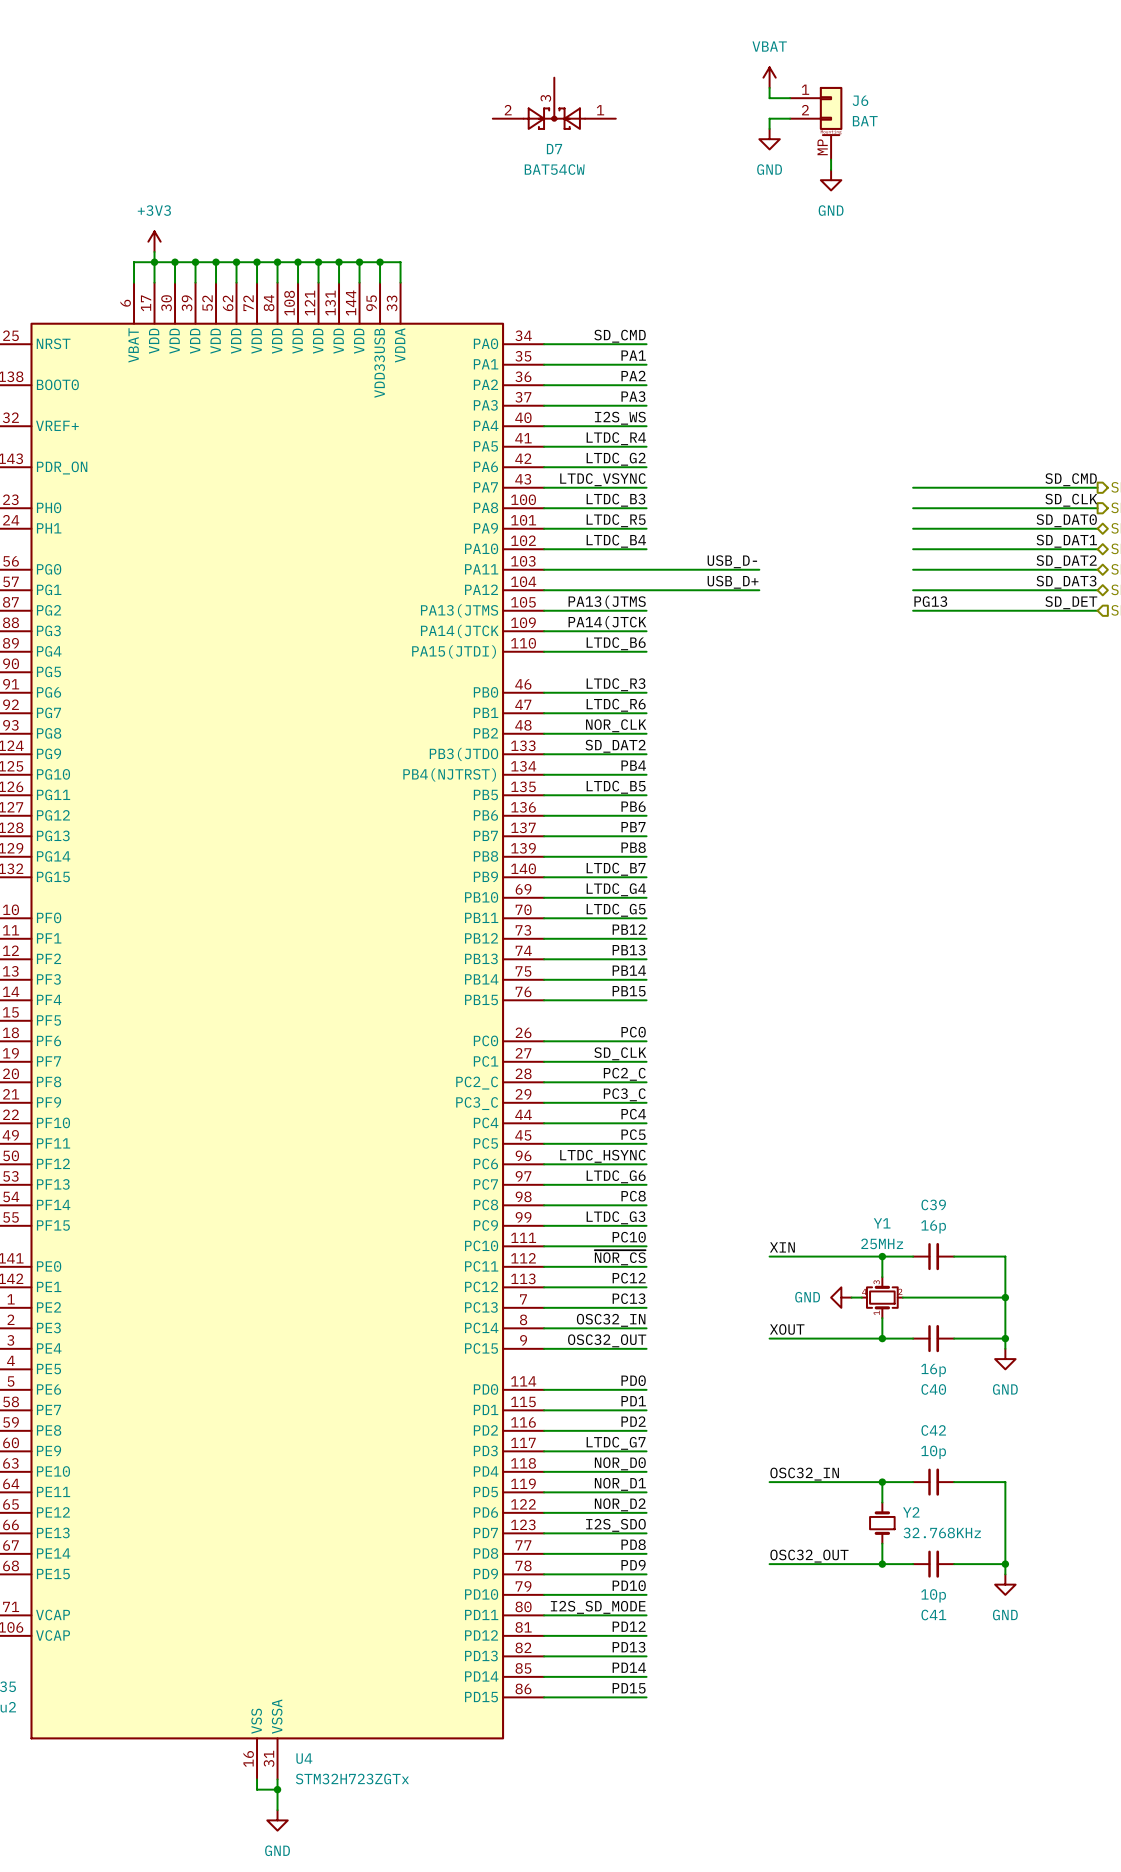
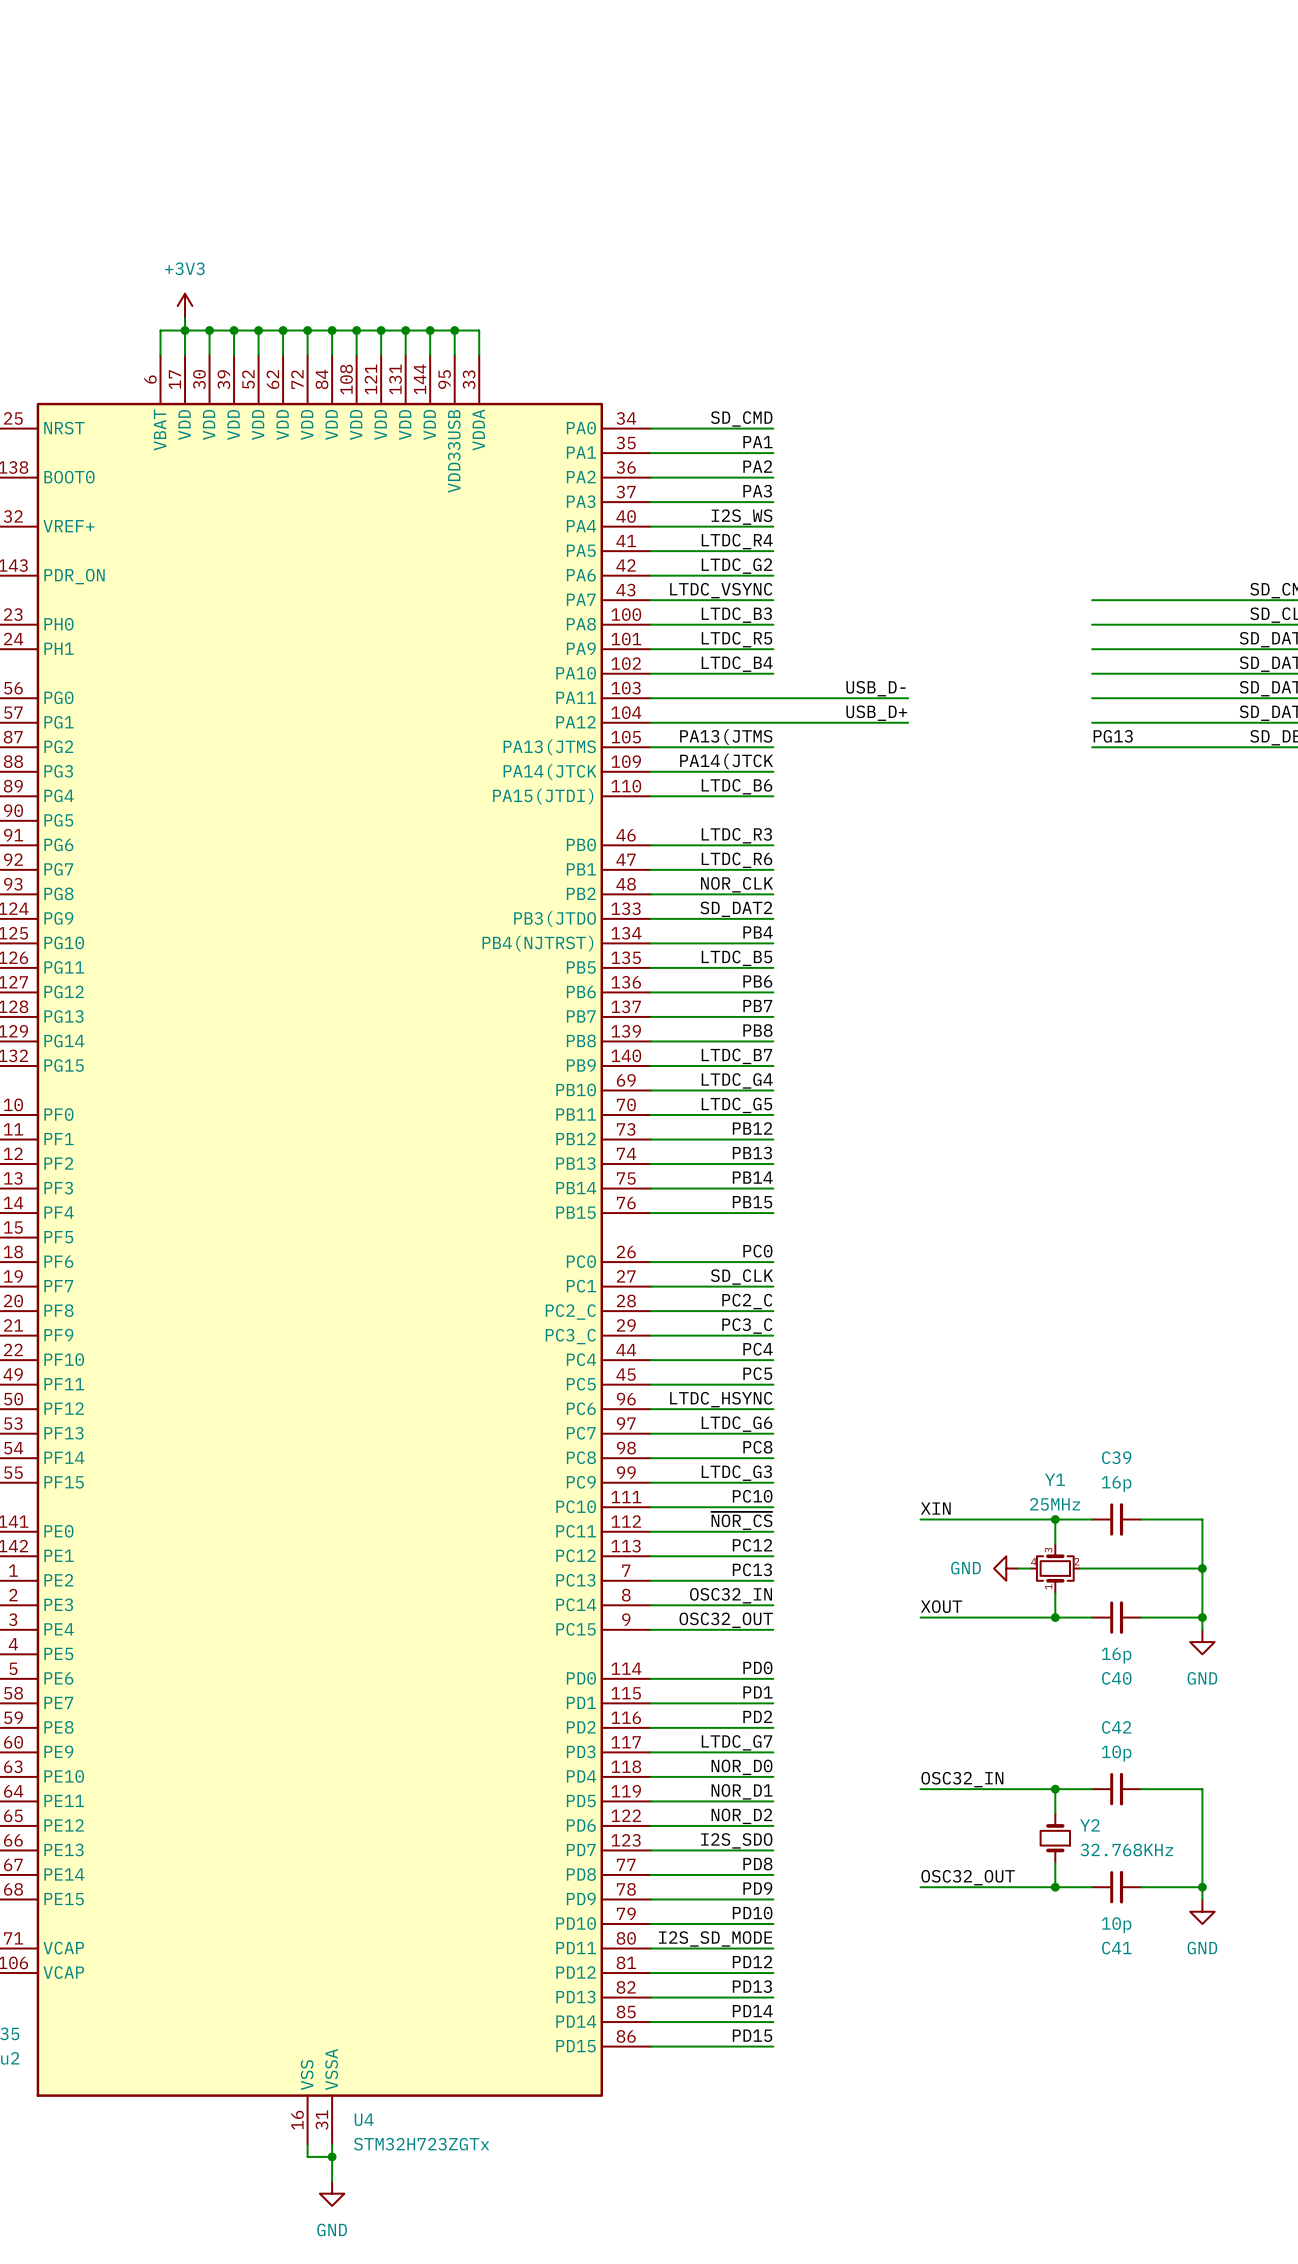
power symbol: VBAT (769, 77) -> none
wire: (769, 87) (769, 98) (790, 98) -> none
D7: BAT54CW (554, 103) -> none
wire: (790, 118) (769, 118) (769, 128) -> none
J6: BAT (816, 123) -> none
power symbol: GND (769, 139) -> none
wire: (831, 159) (831, 169) -> none
power symbol: GND (831, 180) -> none

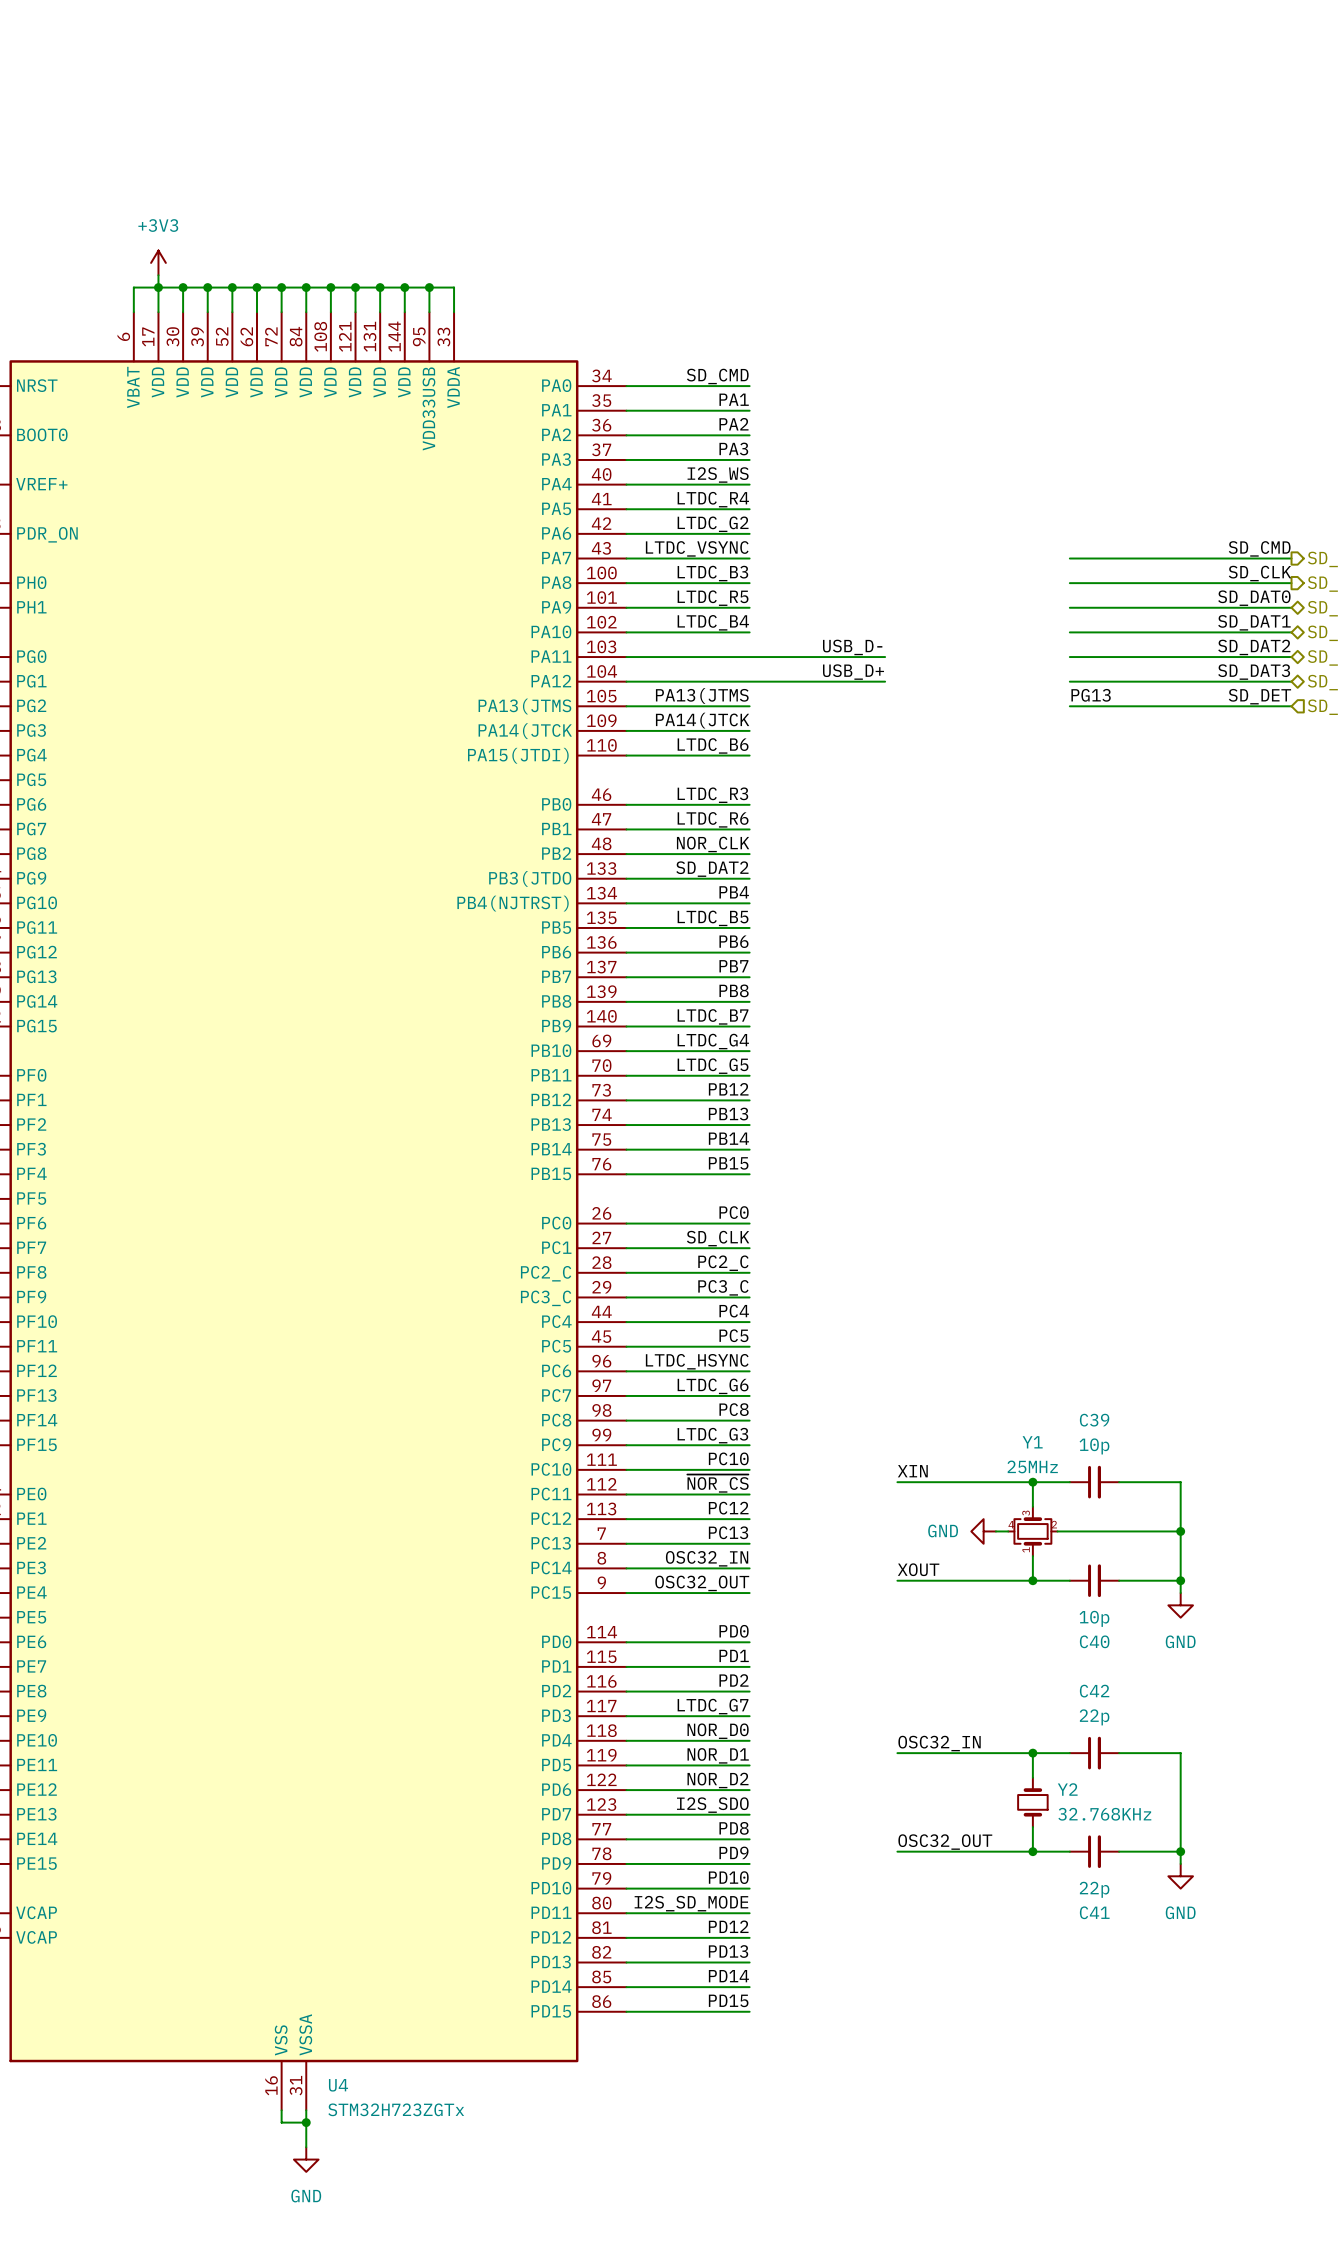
C39 value: 16p (1116, 1484) -> 10p (1094, 1446)
C40 value: 16p (1116, 1655) -> 10p (1094, 1618)
C42 value: 10p (1116, 1753) -> 22p (1094, 1717)
C41 value: 10p (1116, 1925) -> 22p (1094, 1889)

